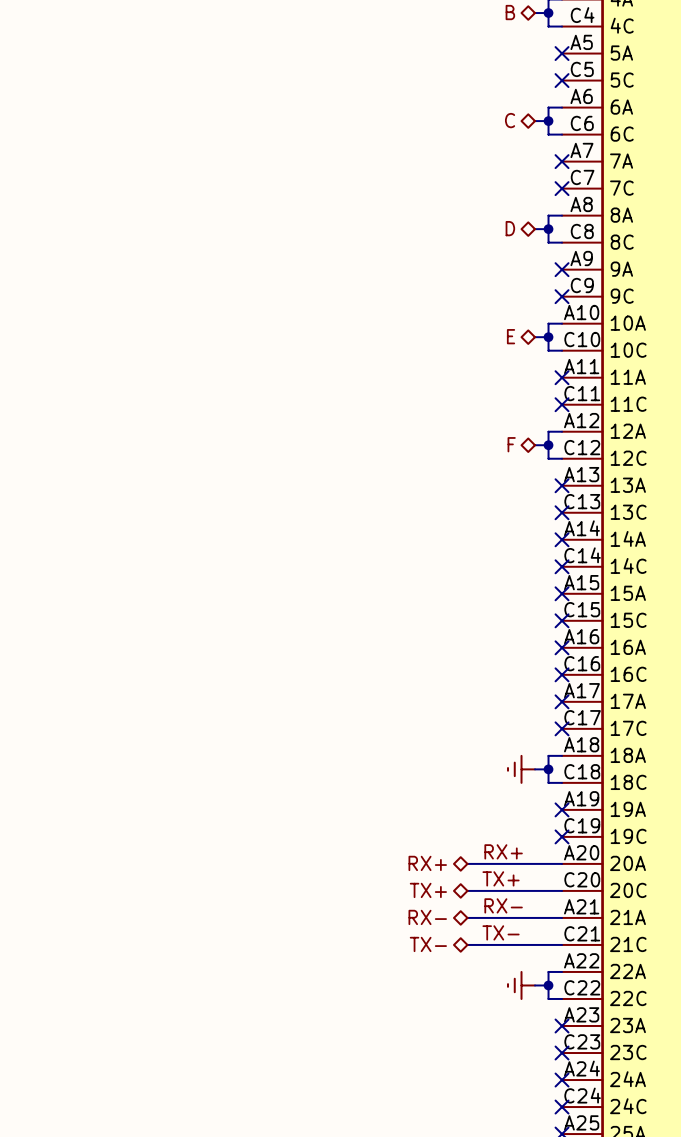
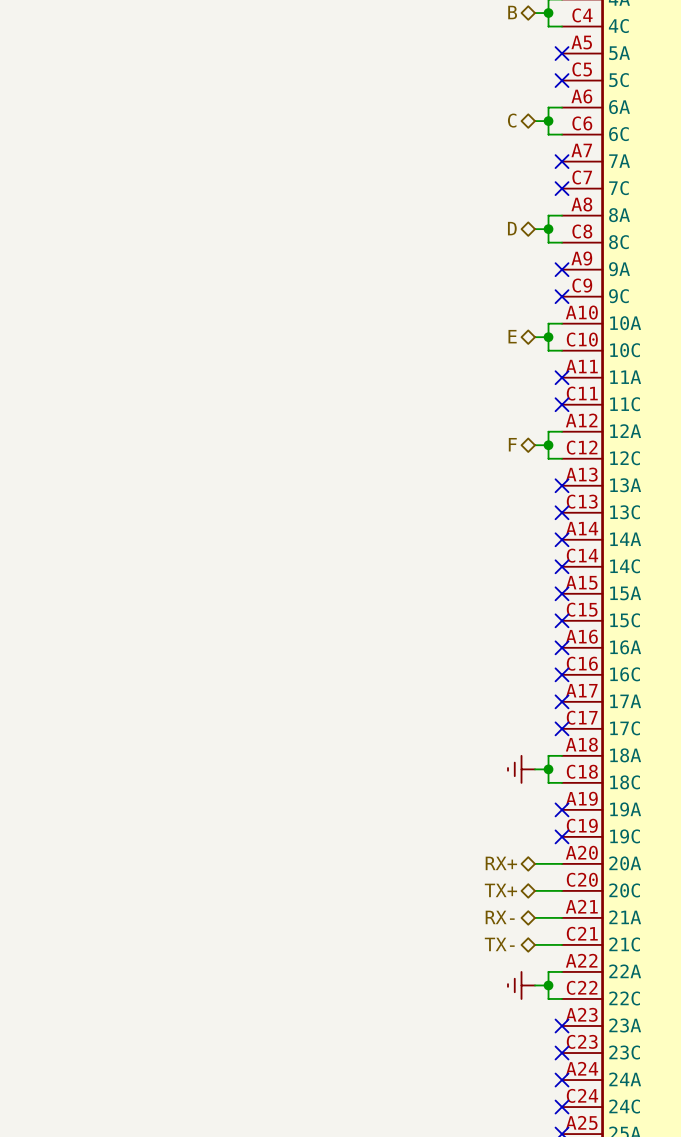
label: RX+ (503, 851) -> none
hierarchical label position: RX+ (427, 863) -> RX+ (501, 863)
wire: (467, 863) (535, 863) -> none
label: TX+ (501, 878) -> none
hierarchical label position: TX+ (428, 890) -> TX+ (500, 890)
wire: (467, 890) (535, 890) -> none
label: RX- (503, 905) -> none
hierarchical label position: RX- (427, 917) -> RX- (500, 917)
wire: (467, 917) (535, 917) -> none
label: TX- (501, 932) -> none
hierarchical label position: TX- (428, 944) -> TX- (499, 944)
wire: (467, 944) (535, 944) -> none

